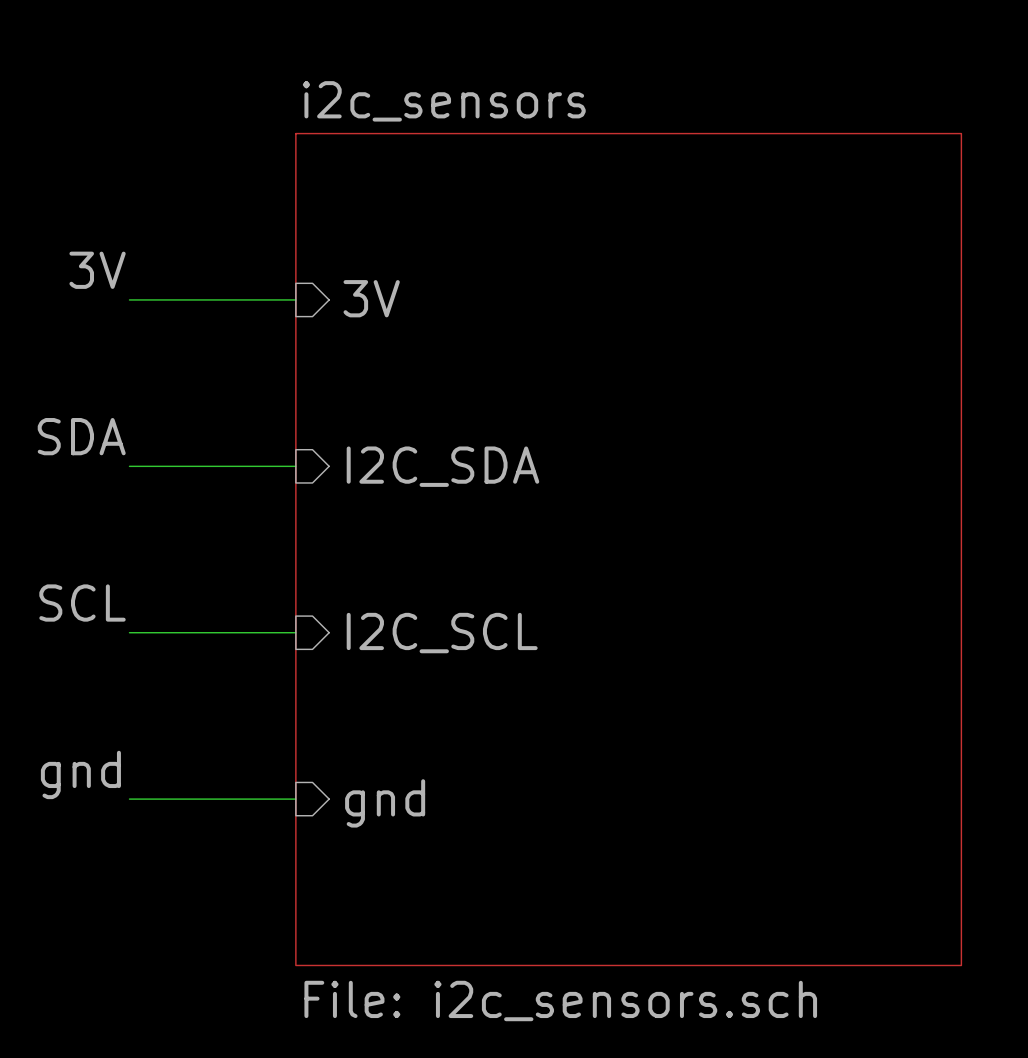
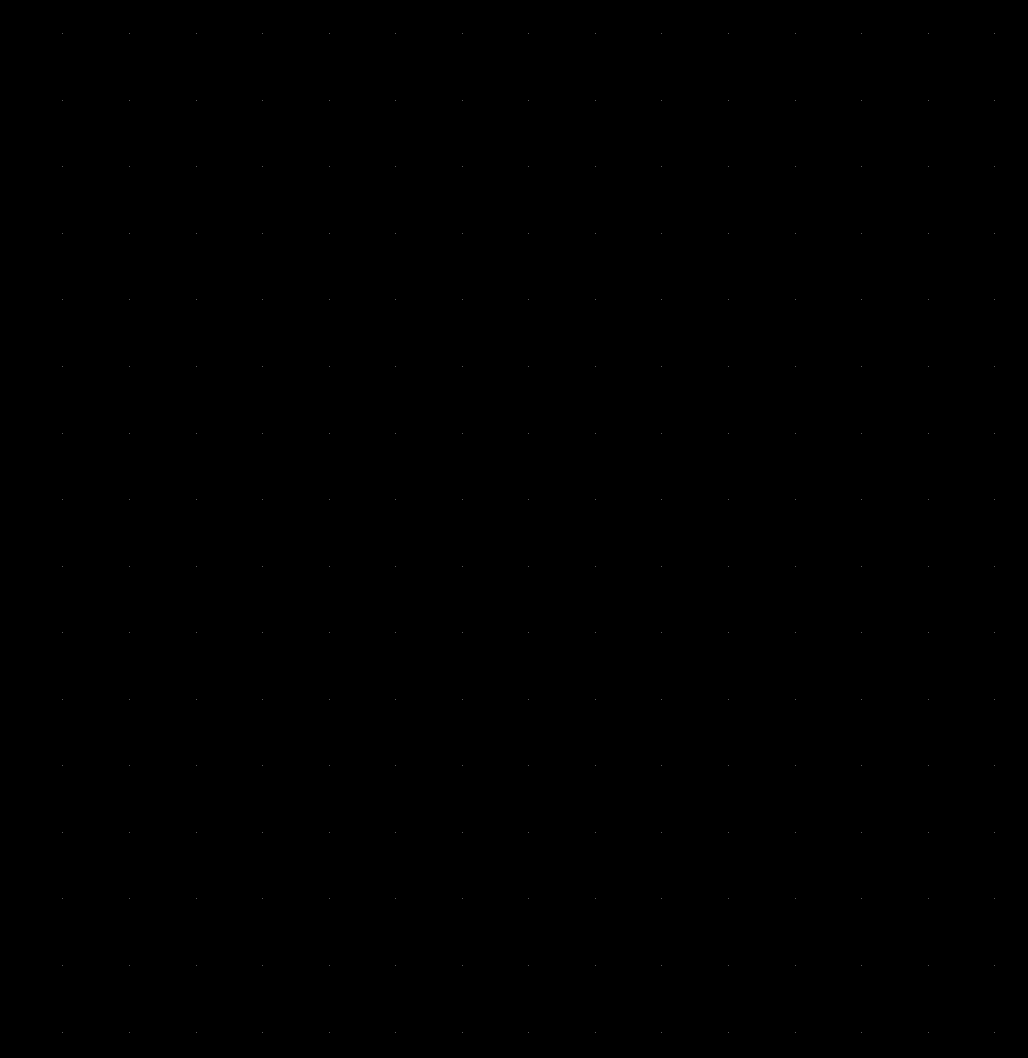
label: 3V (97, 270) -> none
sheet pin: 3V (371, 298) -> none
wire: (129, 299) (295, 299) -> none
label: SDA (81, 436) -> none
wire: (129, 466) (295, 466) -> none
sheet pin: I2C_SDA (442, 466) -> none
sheet i2c_sensors: File: i2c_sensors.sch (628, 549) -> none
label: SCL (82, 603) -> none
wire: (129, 632) (295, 632) -> none
sheet pin: I2C_SCL (442, 633) -> none
label: gnd (80, 774) -> none
wire: (129, 799) (295, 799) -> none
sheet pin: gnd (385, 803) -> none

